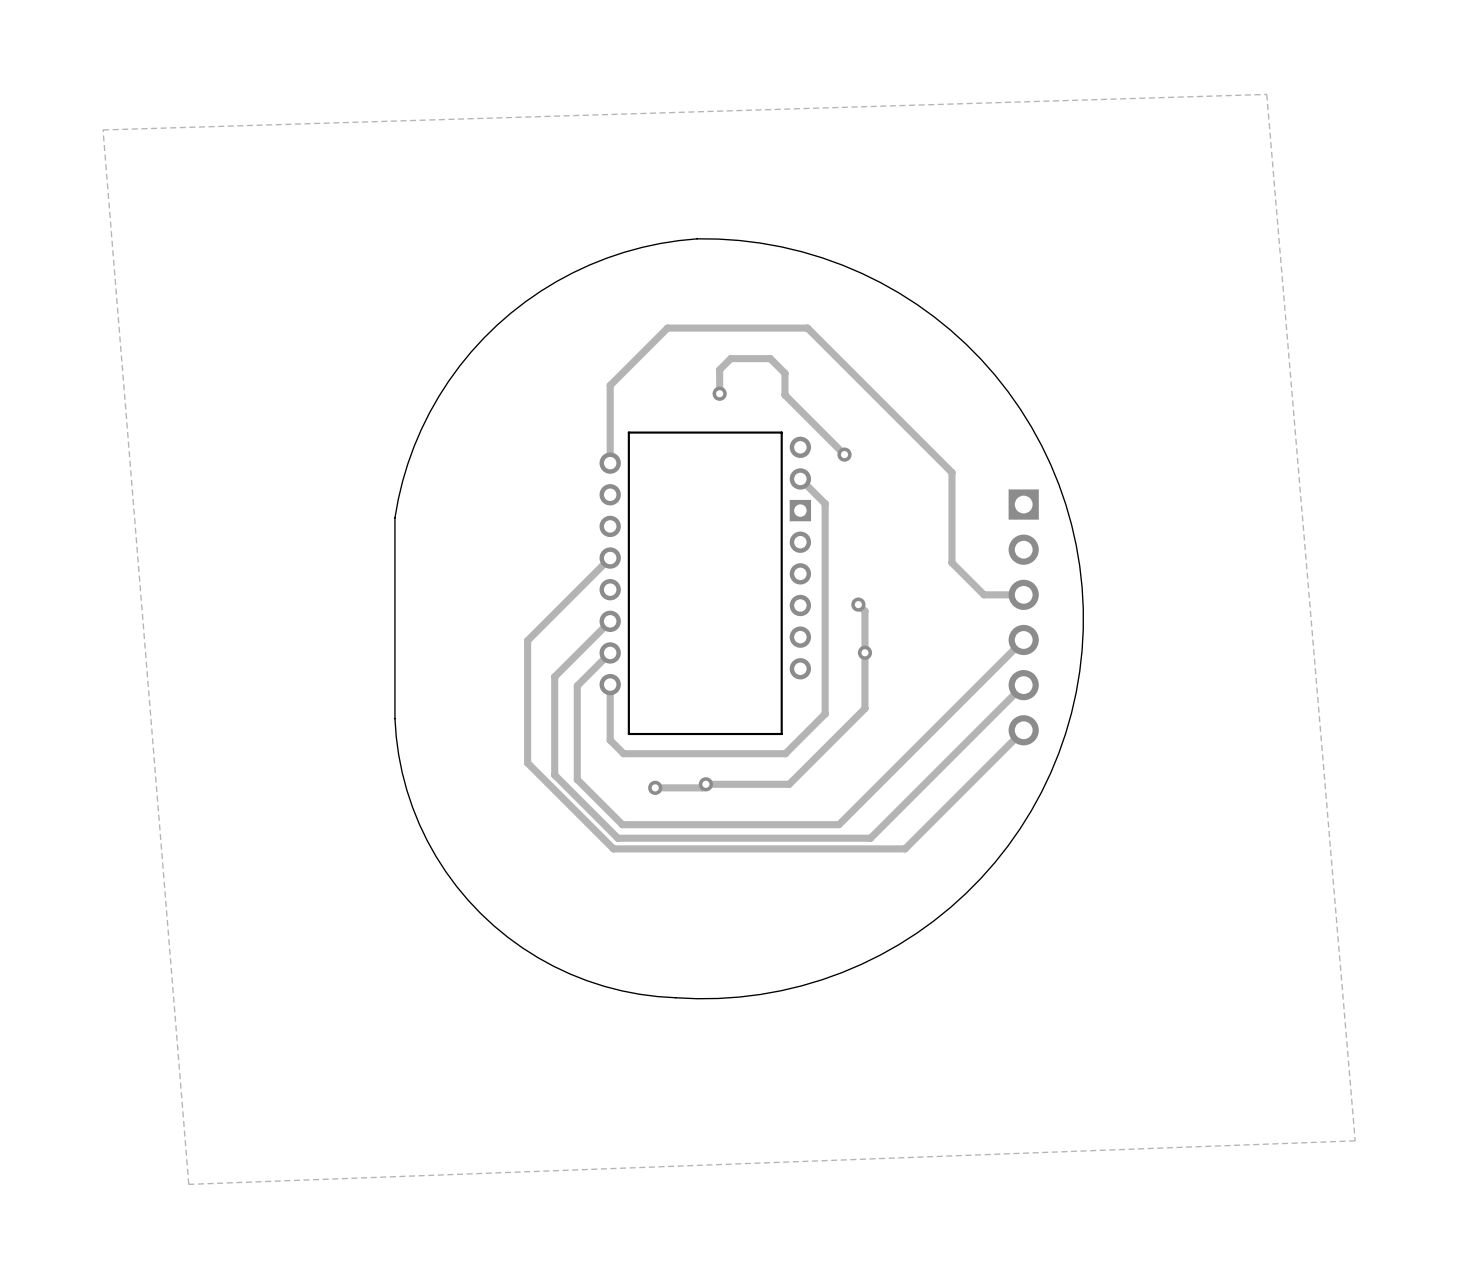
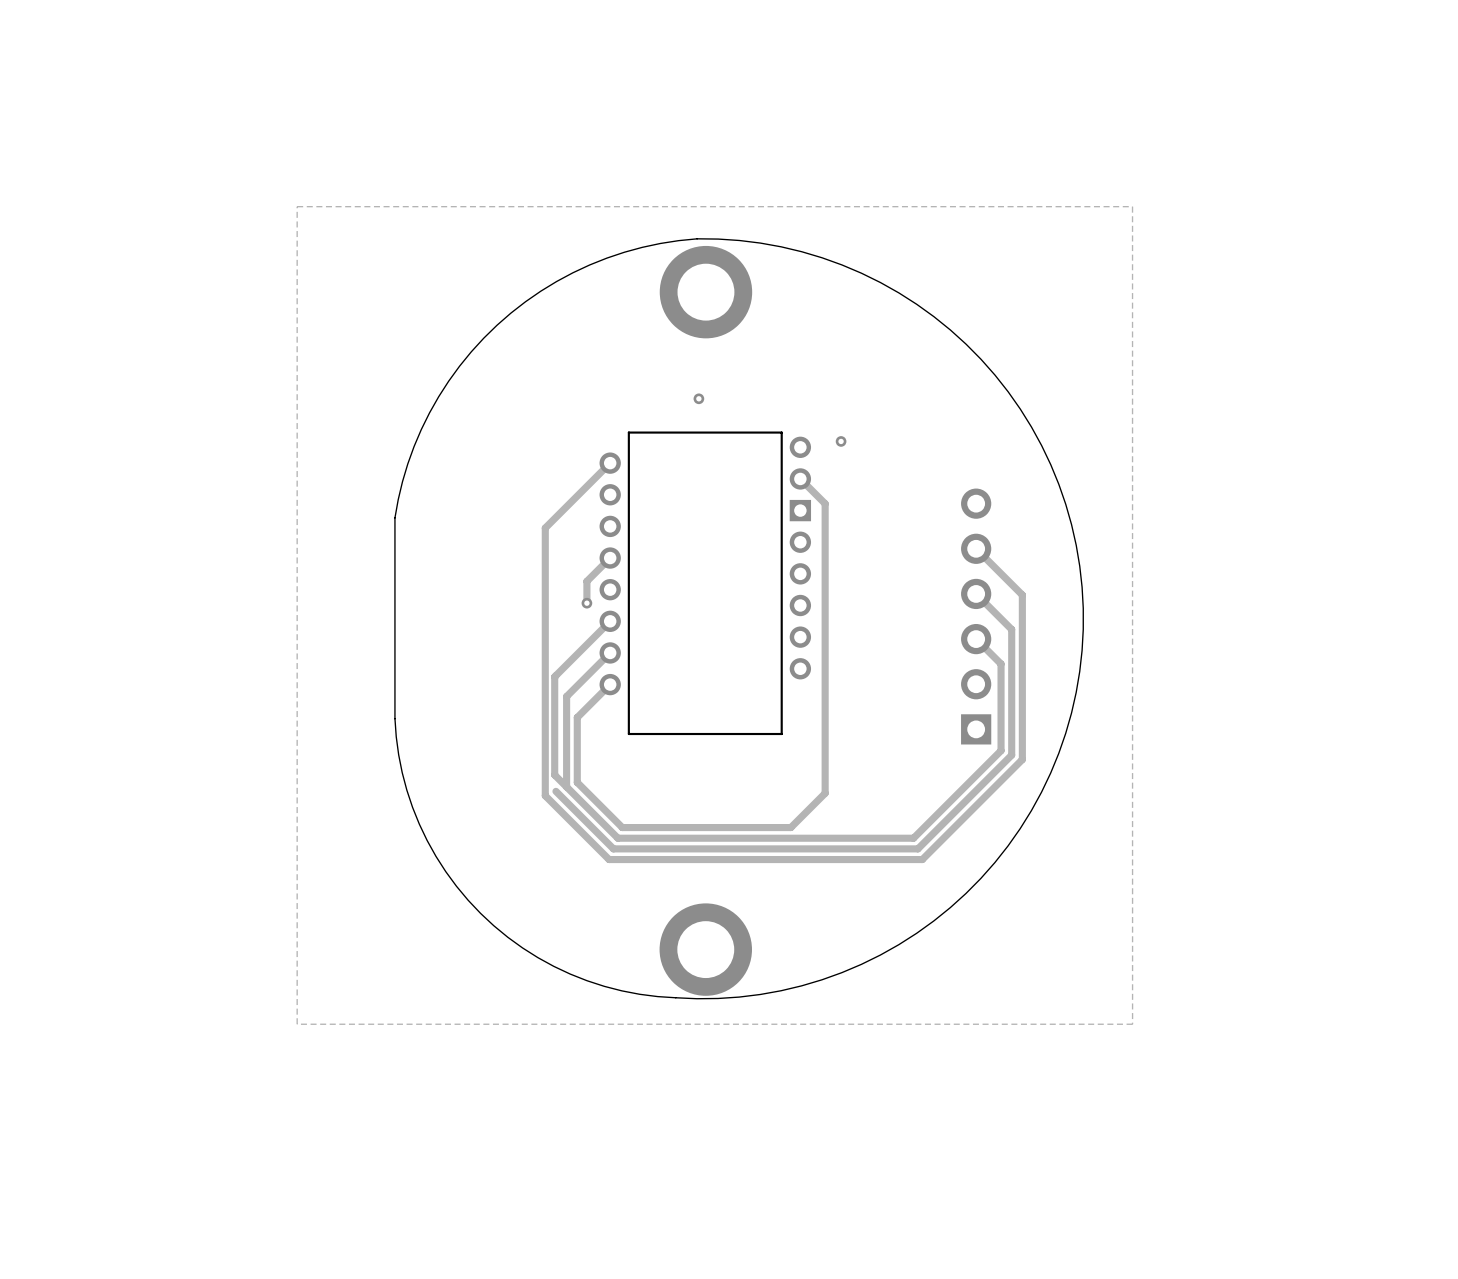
zone outline: (1266, 94) (103, 129) (188, 1184) (1355, 1140) (1266, 94) -> (297, 206) (297, 1024) (1132, 1024) (1132, 206) (297, 206)
part: none -> (705, 292)
track: (719, 393) (719, 369) (730, 358) (770, 358) (784, 373) (784, 395) (844, 454) -> none
via: (719, 393) -> none
via: none -> (698, 398)
via: none -> (841, 441)
via: (844, 454) -> none
track: (610, 463) (610, 385) (667, 328) (807, 328) (951, 472) (951, 562) (983, 594) (1023, 594) -> (610, 463) (545, 528) (545, 795) (609, 859) (922, 859) (1022, 759) (1022, 595) (976, 548)
track: (586, 581) (527, 640) (527, 763) (555, 791) -> (586, 581) (586, 603)
via: none -> (586, 603)
track: (858, 604) (864, 611) (864, 708) (789, 784) (705, 784) (702, 787) (655, 787) -> none
via: (858, 604) -> none
part rotation: 0° (1023, 617) -> 180° (976, 616)
track: (1023, 639) (838, 824) (622, 824) (577, 779) -> none
via: (864, 652) -> none
track: (610, 684) (610, 740) (623, 753) (785, 753) (825, 713) -> (577, 779) (577, 782) (622, 827) (790, 827) (825, 793) (825, 713)
track: (577, 685) (577, 717) -> (610, 684) (577, 717)
track: none -> (577, 685) (566, 696) (566, 786)
track: (1023, 685) (870, 838) -> (976, 639) (1001, 663) (1001, 750) (913, 838) (870, 838)
track: (1023, 730) (905, 848) -> (976, 593) (1011, 629) (1011, 755) (917, 848) (905, 848)
via: (705, 784) -> none
via: (655, 787) -> none
part: none -> (705, 949)

